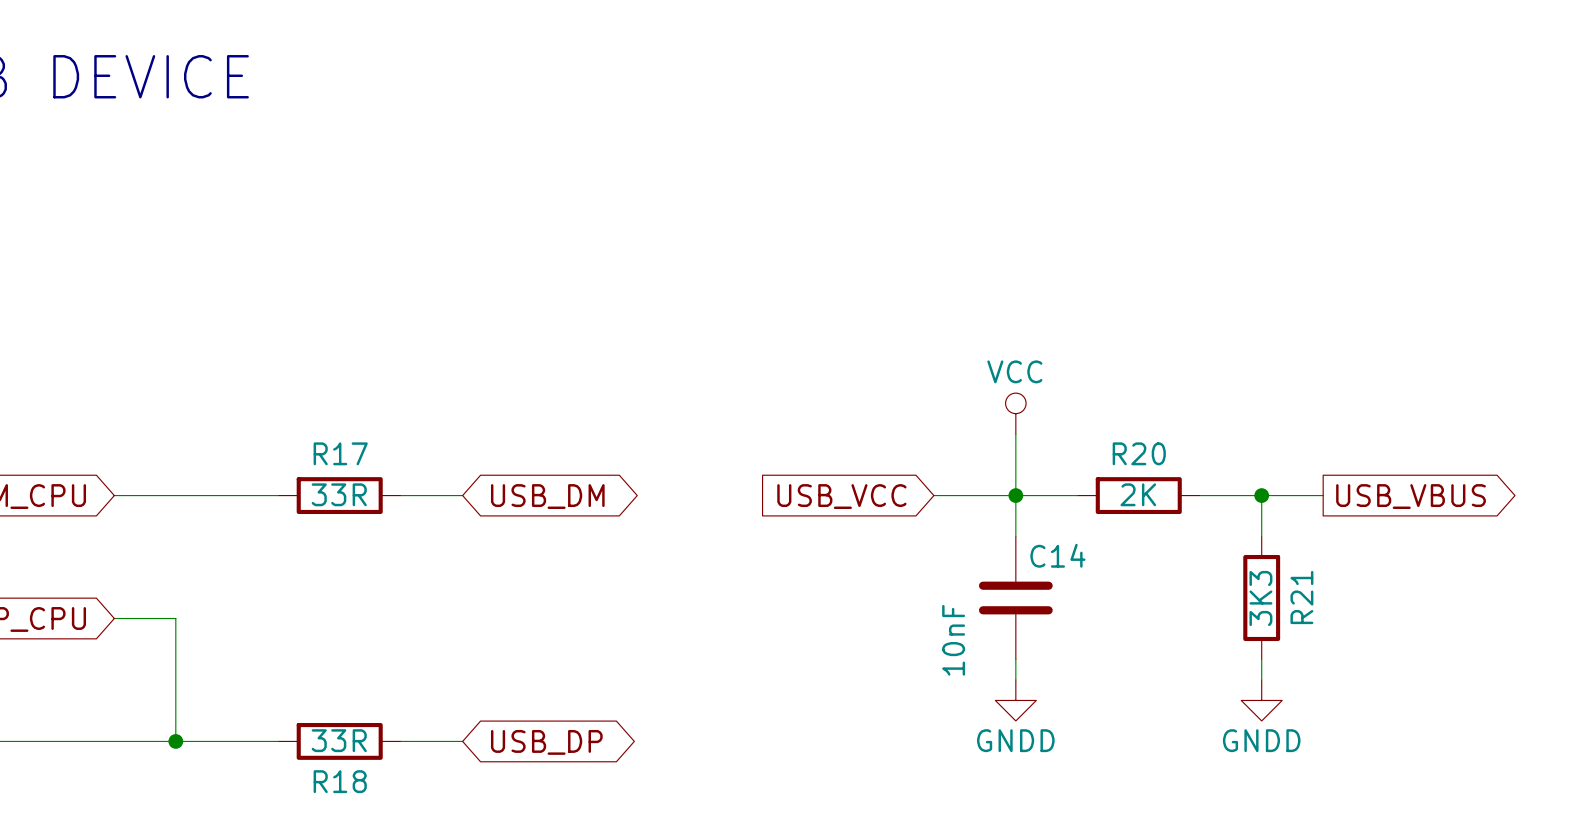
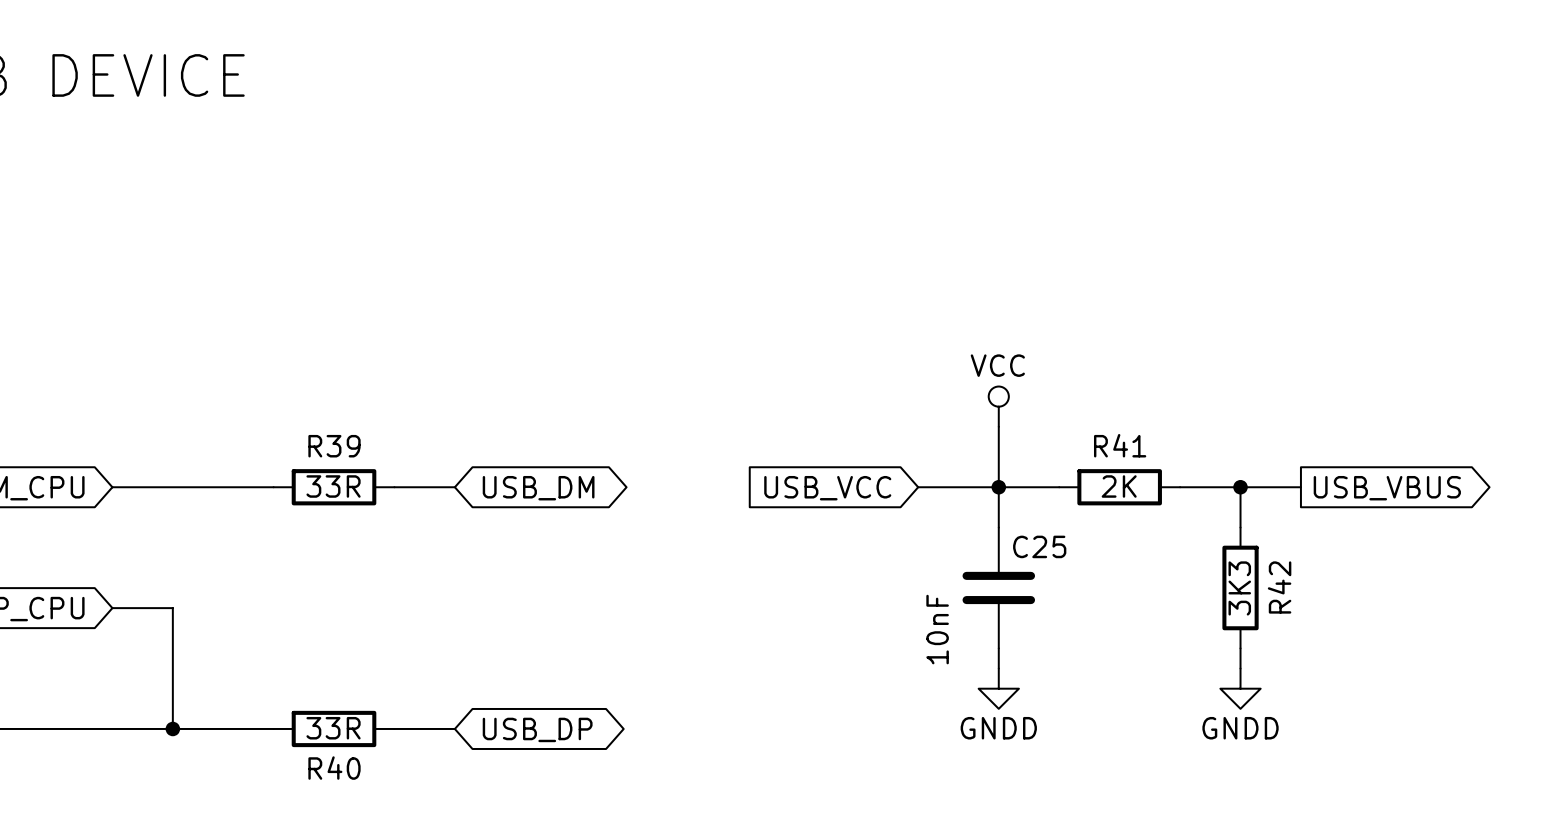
R17 name: R17 (340, 453) -> R39 (334, 446)
R20 name: R20 (1139, 453) -> R41 (1120, 445)
C14 name: C14 (1057, 555) -> C25 (1039, 546)
R21 name: R21 (1301, 597) -> R42 (1279, 587)
R18 name: R18 (340, 781) -> R40 (334, 768)

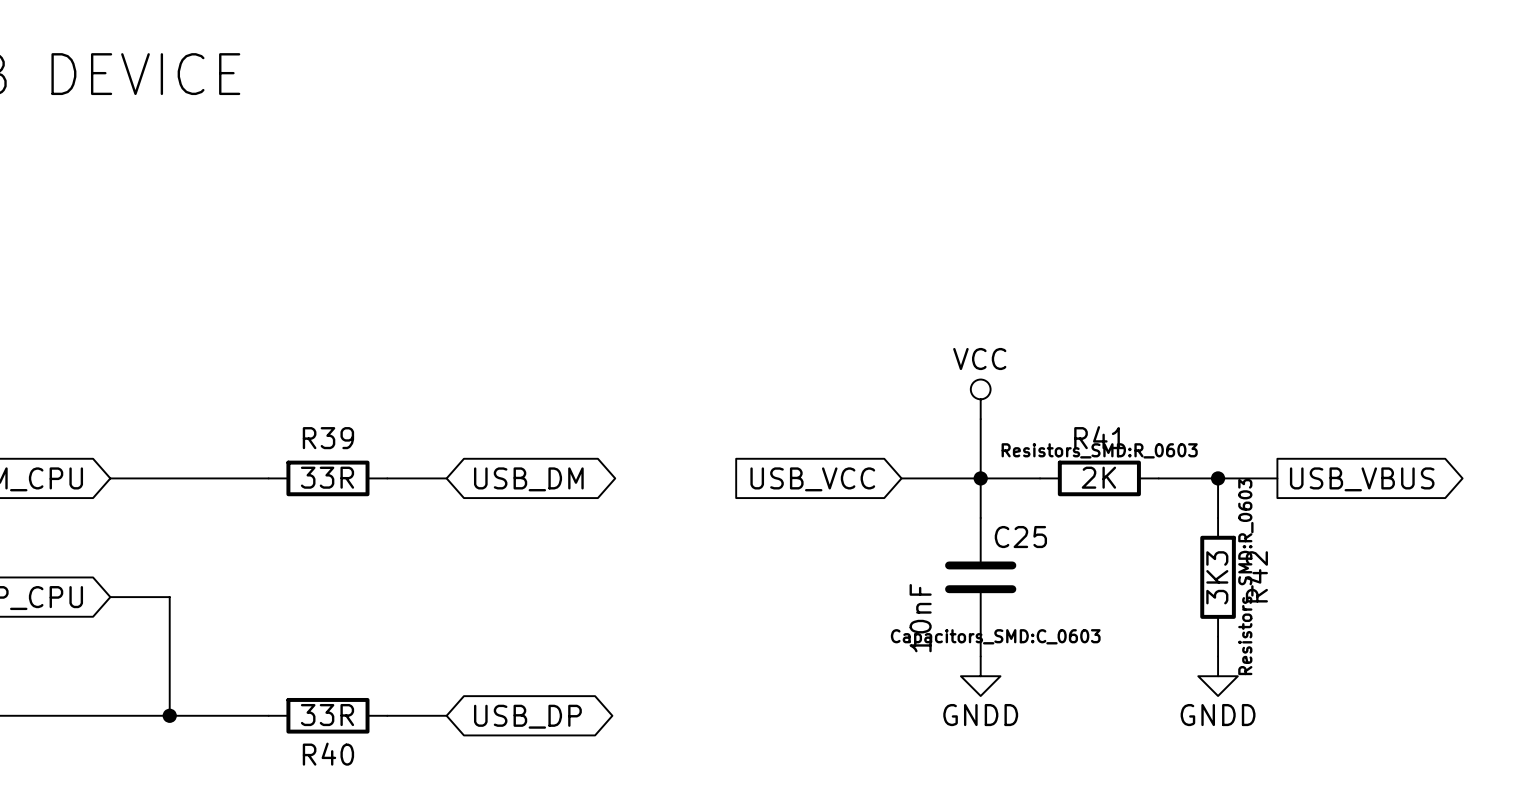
R41 text: none -> Resistors_SMD:R_0603 (1099, 450)
R42 text: none -> Resistors_SMD:R_0603 (1245, 577)
C25 text: none -> Capacitors_SMD:C_0603 (995, 638)

